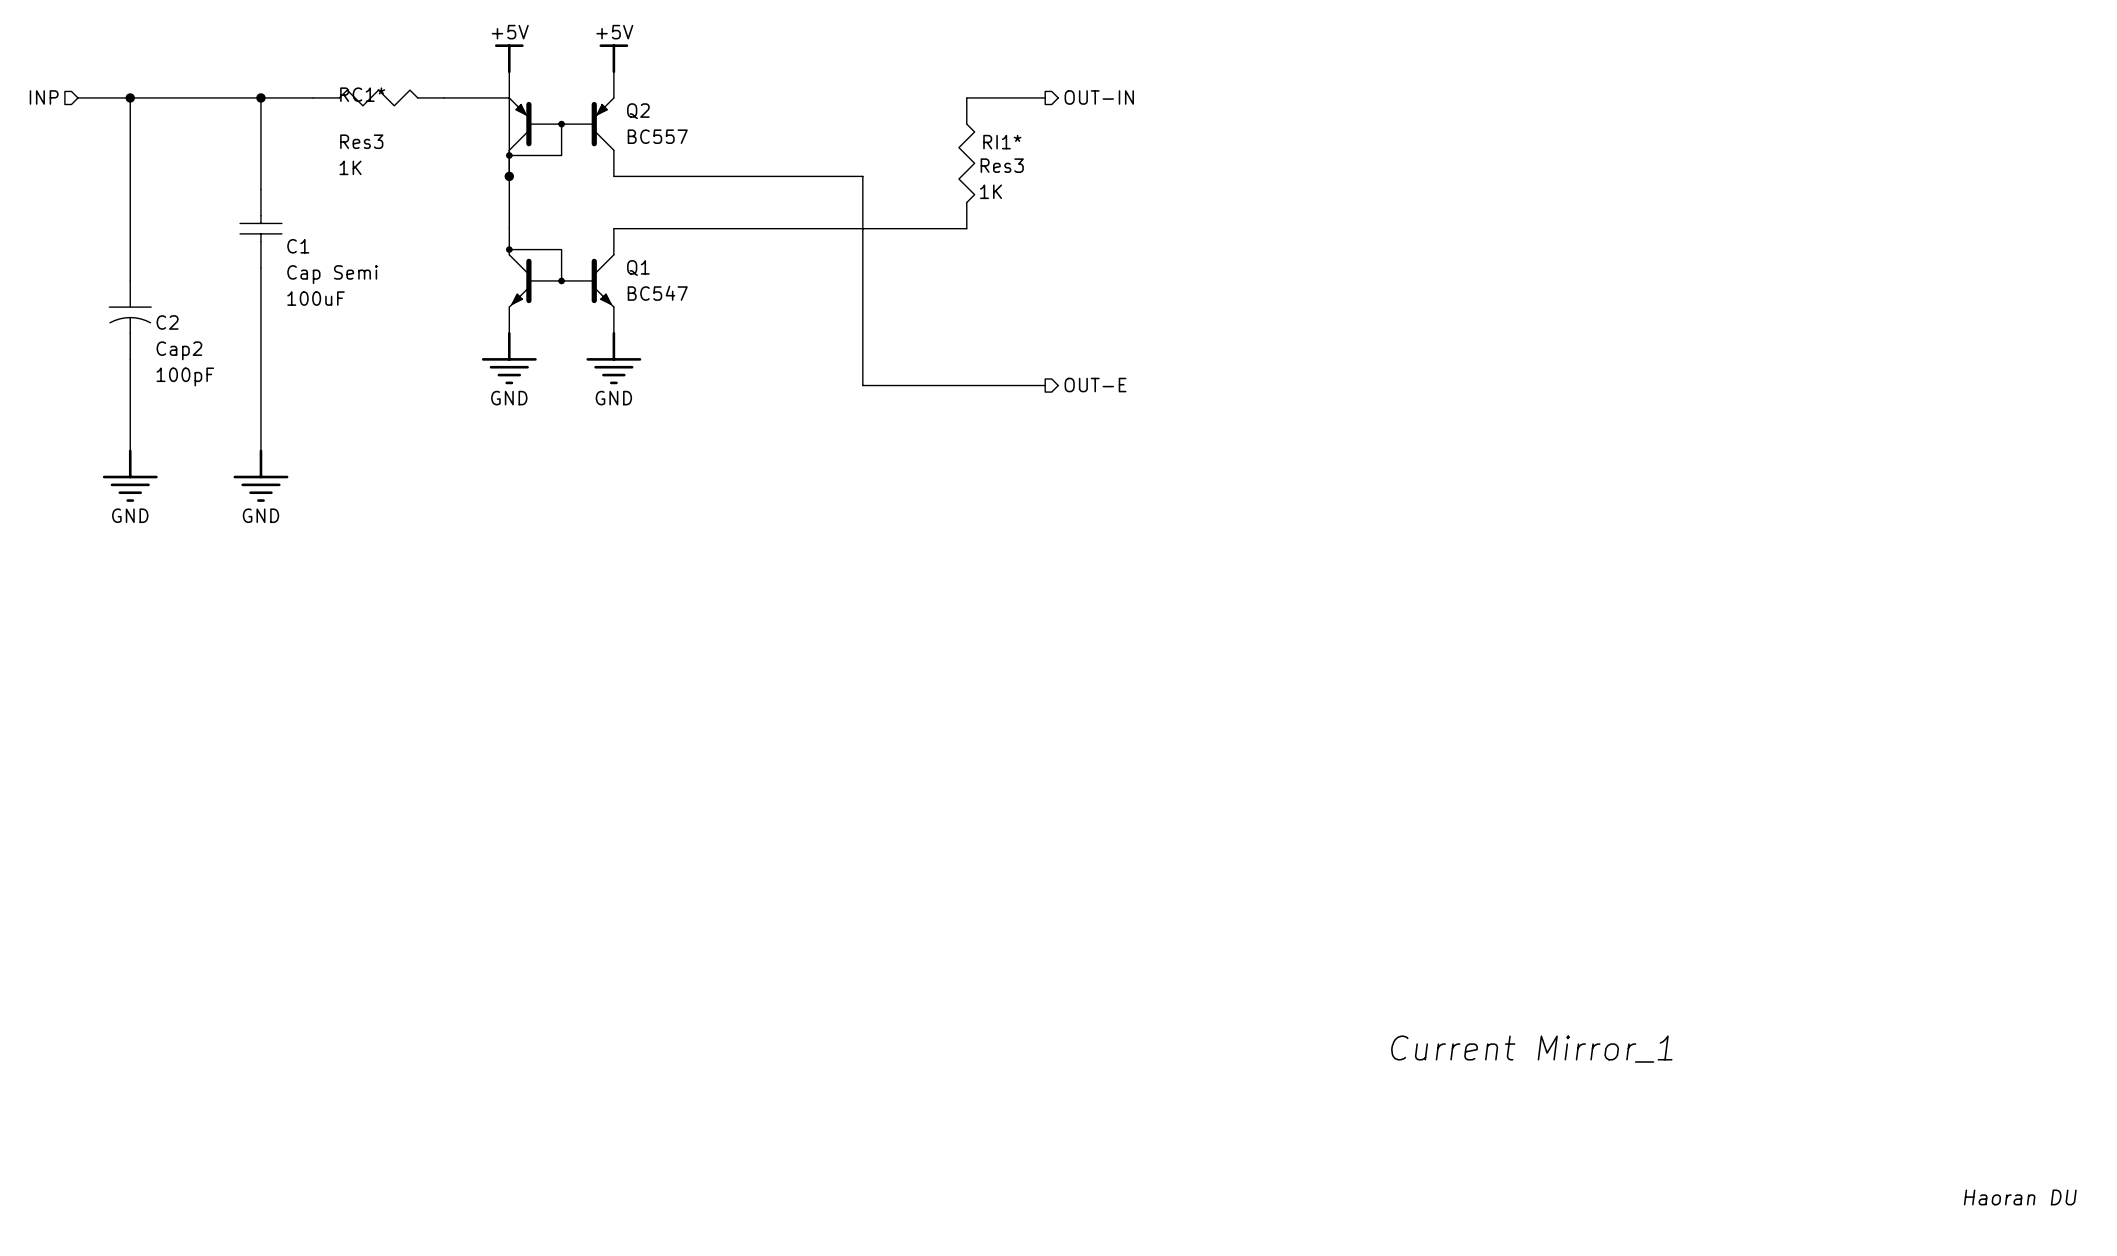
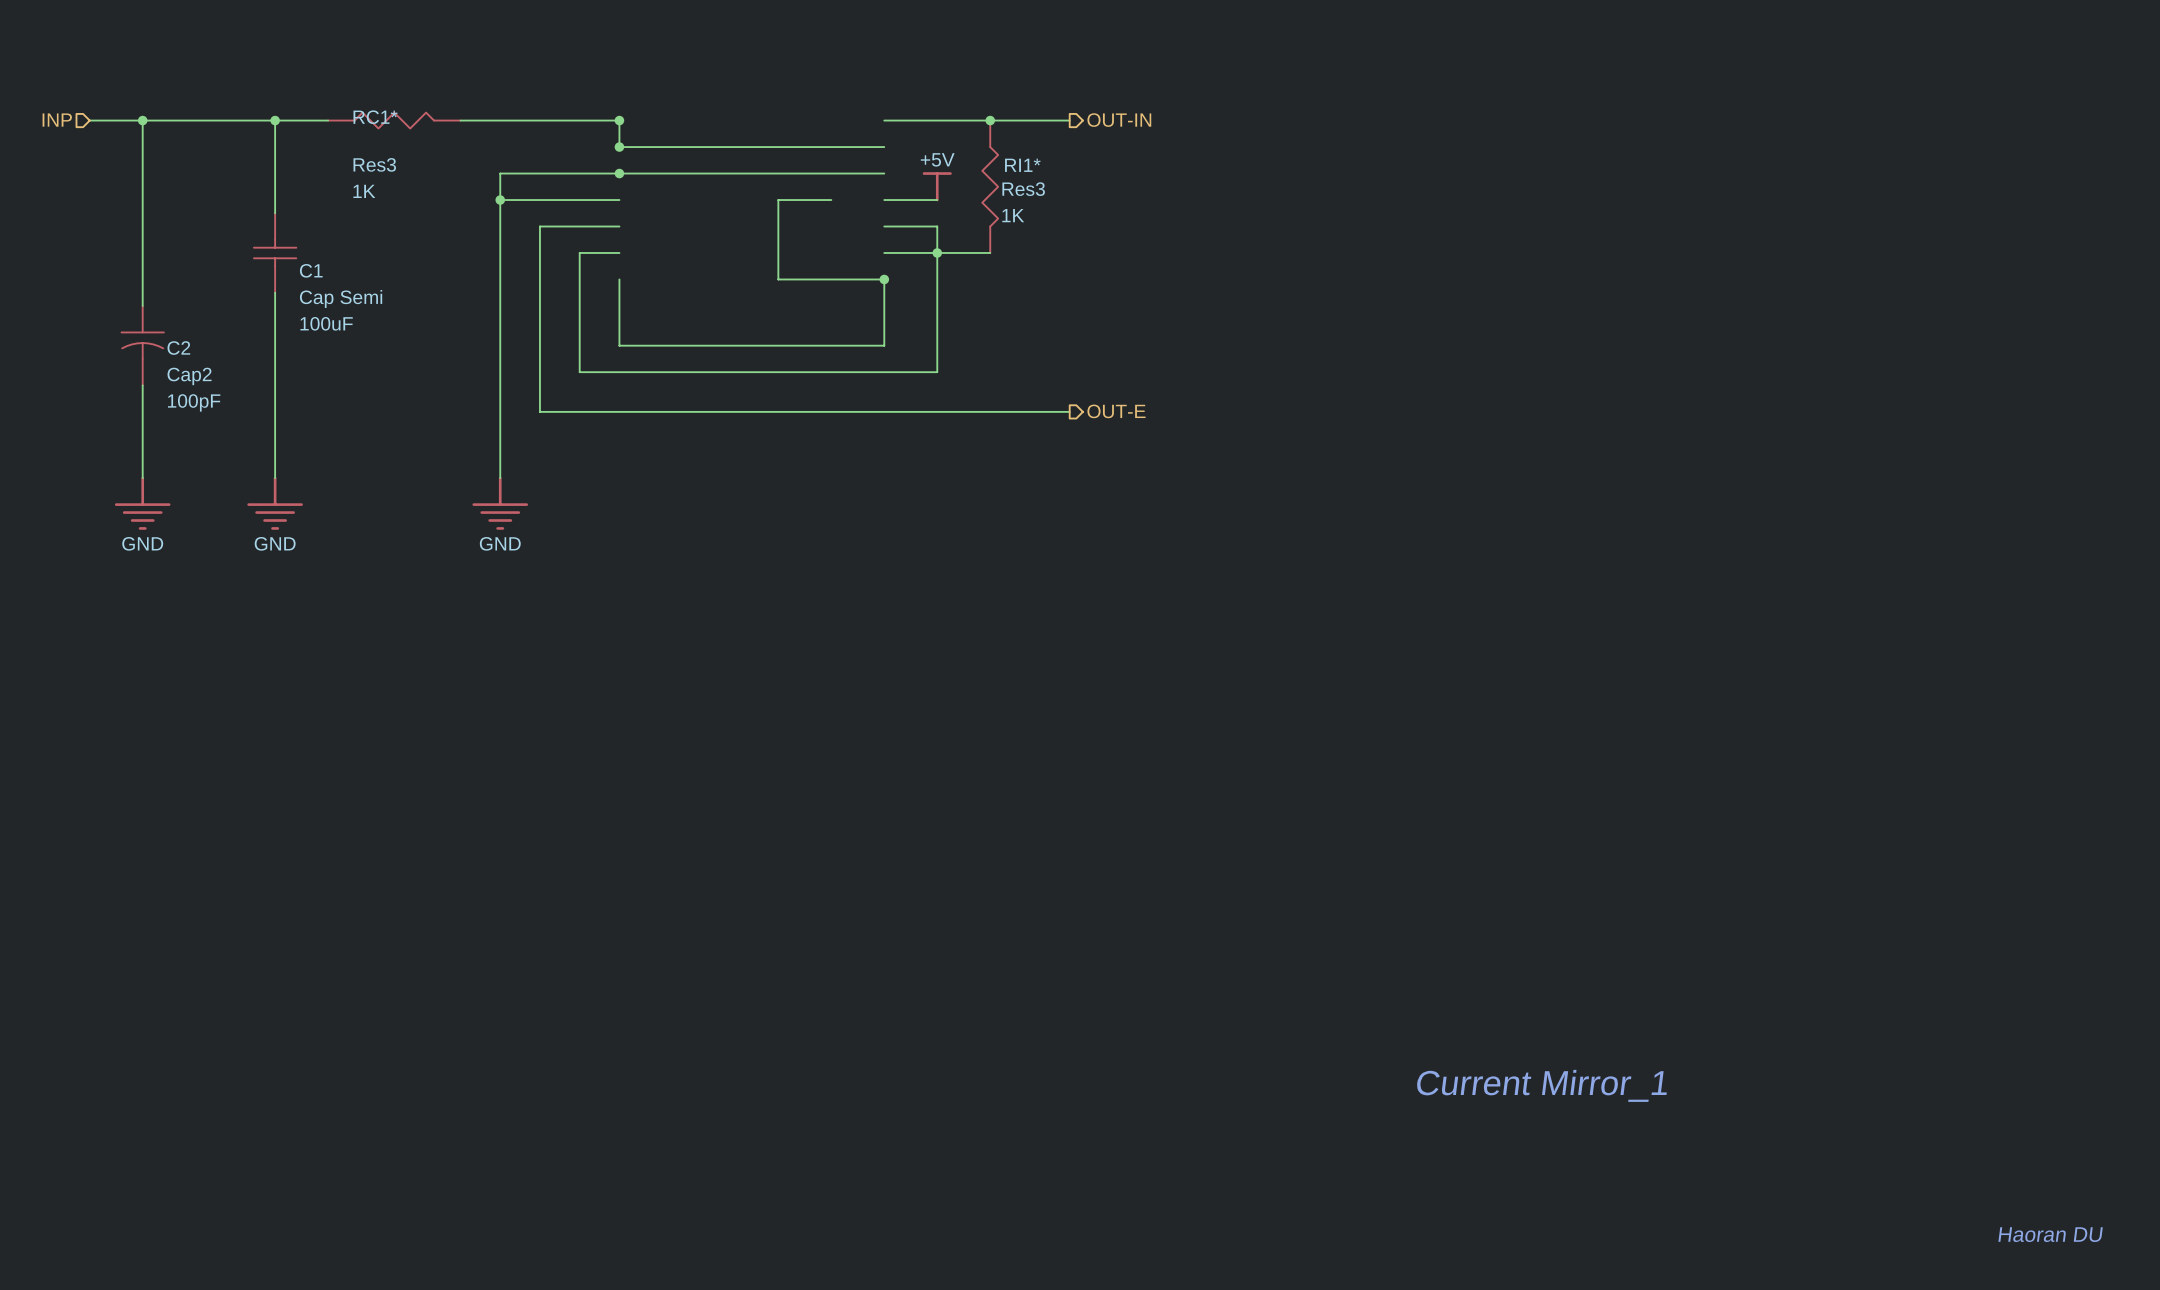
power symbol: +5V (509, 58) -> none
power symbol: +5V (613, 58) -> none
wire: (509, 97) (509, 228) -> (526, 120) (619, 120) (619, 147) (884, 147)
junction: none -> (619, 120)
wire: none -> (884, 120) (990, 120)
junction: none -> (990, 120)
Q2: BC557 (560, 124) -> none
junction: none -> (619, 147)
junction: none -> (619, 173)
wire: none -> (884, 173) (500, 173) (500, 478)
power symbol: none -> +5V (937, 186)
wire: none -> (500, 200) (619, 200)
junction position: (509, 176) -> (500, 200)
wire: (613, 176) (757, 176) -> (619, 279) (619, 345) (884, 345) (884, 279) (778, 279) (778, 200)
wire: (809, 176) (862, 176) -> none
wire: (862, 176) (862, 385) -> (884, 200) (937, 200)
wire: none -> (619, 226) (539, 226) (539, 411) (884, 411)
wire: none -> (884, 226) (937, 226) (937, 372) (579, 372) (579, 252) (619, 252)
wire: (613, 228) (862, 228) -> none
junction: none -> (937, 252)
junction: none -> (884, 279)
Q1: BC547 (560, 280) -> none
power symbol: GND (509, 358) -> none
power symbol: GND (613, 358) -> none
power symbol: none -> GND (500, 503)

